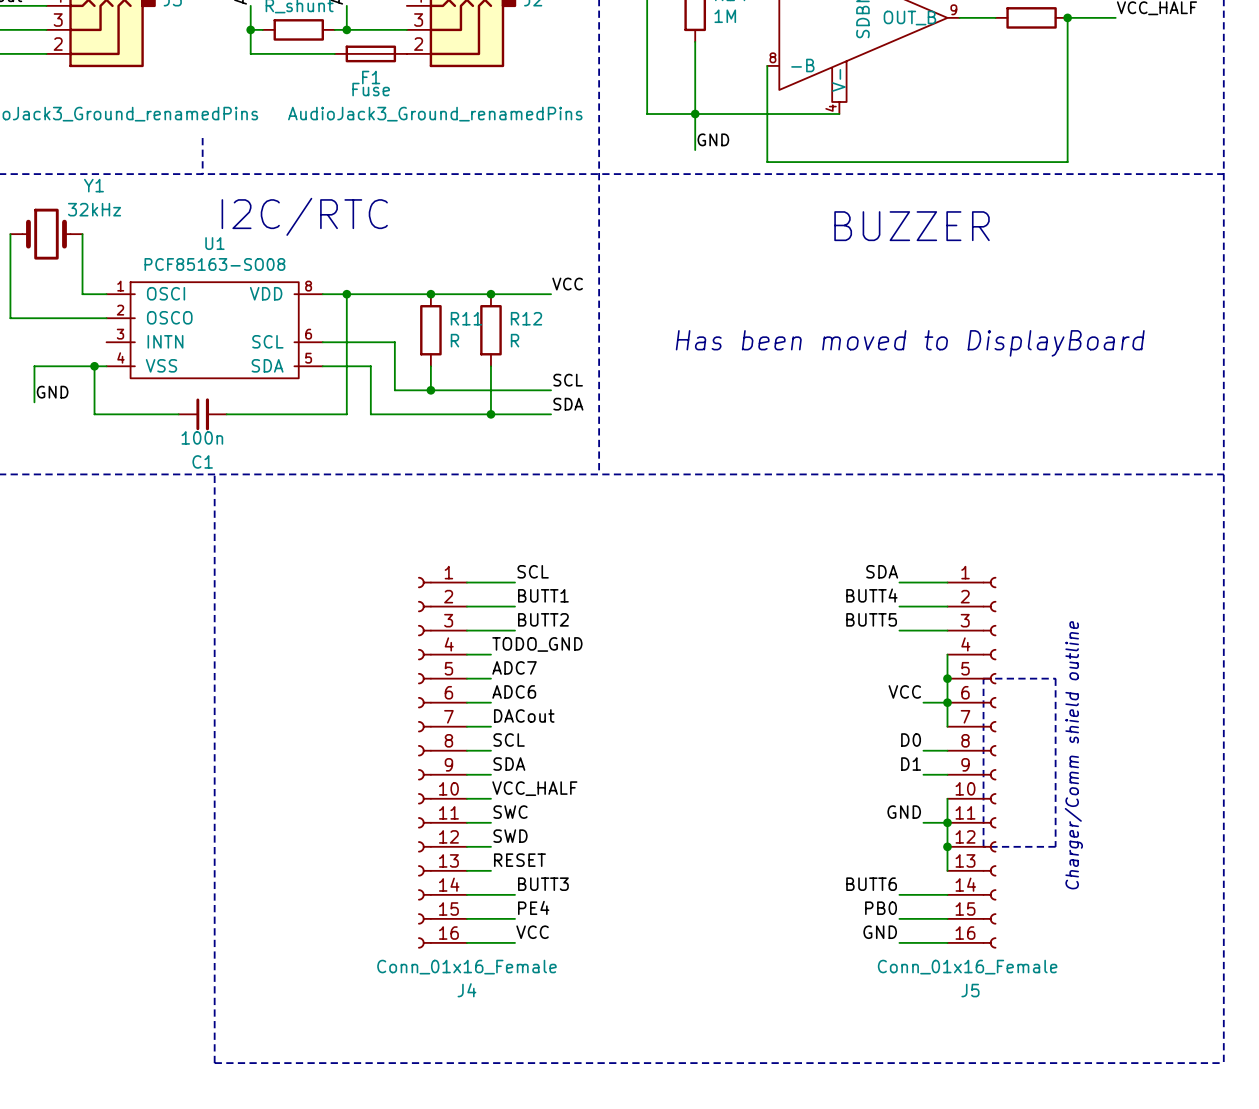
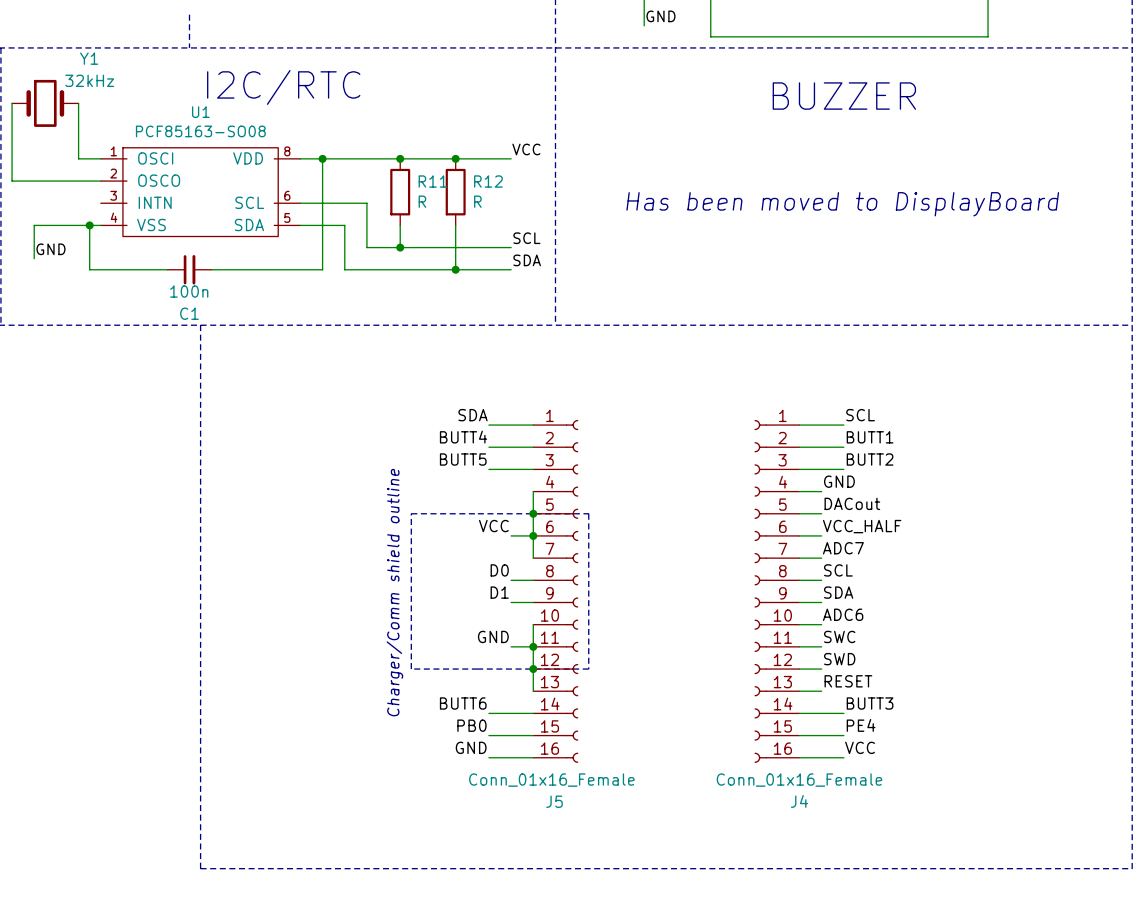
label: none -> SDA (473, 415)
label: SCL (533, 571) -> none
label: SDA (882, 571) -> none
label: none -> SCL (860, 415)
wire: (466, 582) (515, 582) -> (488, 425) (533, 425)
wire: (911, 582) (947, 582) -> (799, 425) (832, 425)
label: BUTT1 (543, 595) -> BUTT4 (463, 437)
label: BUTT4 (871, 595) -> none
label: none -> BUTT1 (870, 437)
wire: (466, 606) (515, 606) -> (488, 447) (533, 447)
wire: (911, 606) (947, 606) -> (799, 447) (832, 447)
label: BUTT2 (543, 619) -> BUTT5 (463, 459)
label: BUTT5 (871, 619) -> none
label: none -> BUTT2 (870, 459)
wire: (466, 630) (515, 630) -> (488, 469) (533, 469)
wire: (911, 630) (947, 630) -> (799, 469) (832, 469)
label: none -> GND (839, 481)
label: TODO_GND (537, 644) -> none
wire: (466, 654) (490, 654) -> none
wire: none -> (533, 491) (533, 558)
wire: none -> (799, 491) (821, 491)
wire: (947, 654) (947, 726) -> none
label: ADC7 (514, 667) -> none
label: none -> DACout (852, 503)
line: none -> (411, 513) (588, 513) (588, 669) (411, 669) (411, 513)
junction: none -> (533, 513)
wire: none -> (799, 513) (821, 513)
junction: (947, 678) -> none
line: (983, 678) (983, 846) (1055, 846) (1055, 678) (983, 678) -> none
label: ADC6 (514, 691) -> none
label: none -> VCC (493, 526)
label: VCC (904, 691) -> none
label: none -> VCC_HALF (862, 526)
wire: (466, 702) (490, 702) -> (511, 535) (533, 535)
junction: none -> (533, 535)
wire: (923, 702) (947, 702) -> (799, 535) (821, 535)
junction: (947, 702) -> none
label: DACout (524, 715) -> none
label: none -> ADC7 (843, 548)
wire: (466, 726) (490, 726) -> none
wire: none -> (799, 558) (821, 558)
label: SCL (509, 740) -> none
label: none -> D0 (499, 570)
label: none -> SCL (838, 570)
label: D0 (911, 740) -> none
wire: (466, 750) (490, 750) -> (511, 580) (533, 580)
wire: (923, 750) (947, 750) -> (799, 580) (821, 580)
text: Charger/Comm shield outline (1073, 755) -> none
J4 position: (442, 762) -> (776, 591)
J5 position: (971, 762) -> (555, 591)
text: none -> Charger/Comm shield outline (394, 592)
label: SDA (509, 764) -> none
label: none -> D1 (499, 592)
label: none -> SDA (838, 592)
label: D1 (911, 764) -> none
wire: (466, 774) (490, 774) -> (511, 602) (533, 602)
wire: (923, 774) (947, 774) -> (799, 602) (821, 602)
label: VCC_HALF (534, 788) -> none
label: none -> ADC6 (843, 614)
wire: (466, 798) (490, 798) -> none
wire: none -> (533, 624) (533, 691)
wire: none -> (799, 624) (821, 624)
wire: (947, 798) (947, 870) -> none
label: SWC (510, 812) -> none
label: none -> GND (493, 636)
label: GND (904, 812) -> none
label: none -> SWC (839, 636)
wire: (466, 822) (490, 822) -> (511, 646) (533, 646)
junction: none -> (533, 646)
wire: (923, 822) (947, 822) -> (799, 646) (821, 646)
junction: (947, 822) -> none
label: SWD (510, 836) -> none
label: none -> SWD (839, 659)
junction: none -> (533, 669)
wire: none -> (799, 669) (821, 669)
junction: (947, 846) -> none
label: RESET (519, 860) -> none
label: none -> RESET (848, 681)
wire: (466, 870) (490, 870) -> none
wire: none -> (799, 691) (821, 691)
label: BUTT3 (543, 884) -> BUTT6 (463, 703)
label: BUTT6 (871, 884) -> none
label: none -> BUTT3 (870, 703)
wire: (466, 894) (515, 894) -> (488, 713) (533, 713)
wire: (911, 894) (947, 894) -> (799, 713) (832, 713)
label: PE4 (533, 907) -> none
label: none -> PE4 (861, 725)
label: none -> PB0 (471, 725)
label: PB0 (881, 908) -> none
wire: (466, 918) (515, 918) -> (488, 735) (533, 735)
wire: (911, 918) (947, 918) -> (799, 735) (832, 735)
label: none -> GND (471, 747)
label: VCC (532, 932) -> none
label: GND (880, 932) -> none
label: none -> VCC (860, 747)
wire: (466, 942) (515, 942) -> (488, 757) (533, 757)
wire: (911, 942) (947, 942) -> (799, 757) (832, 757)

